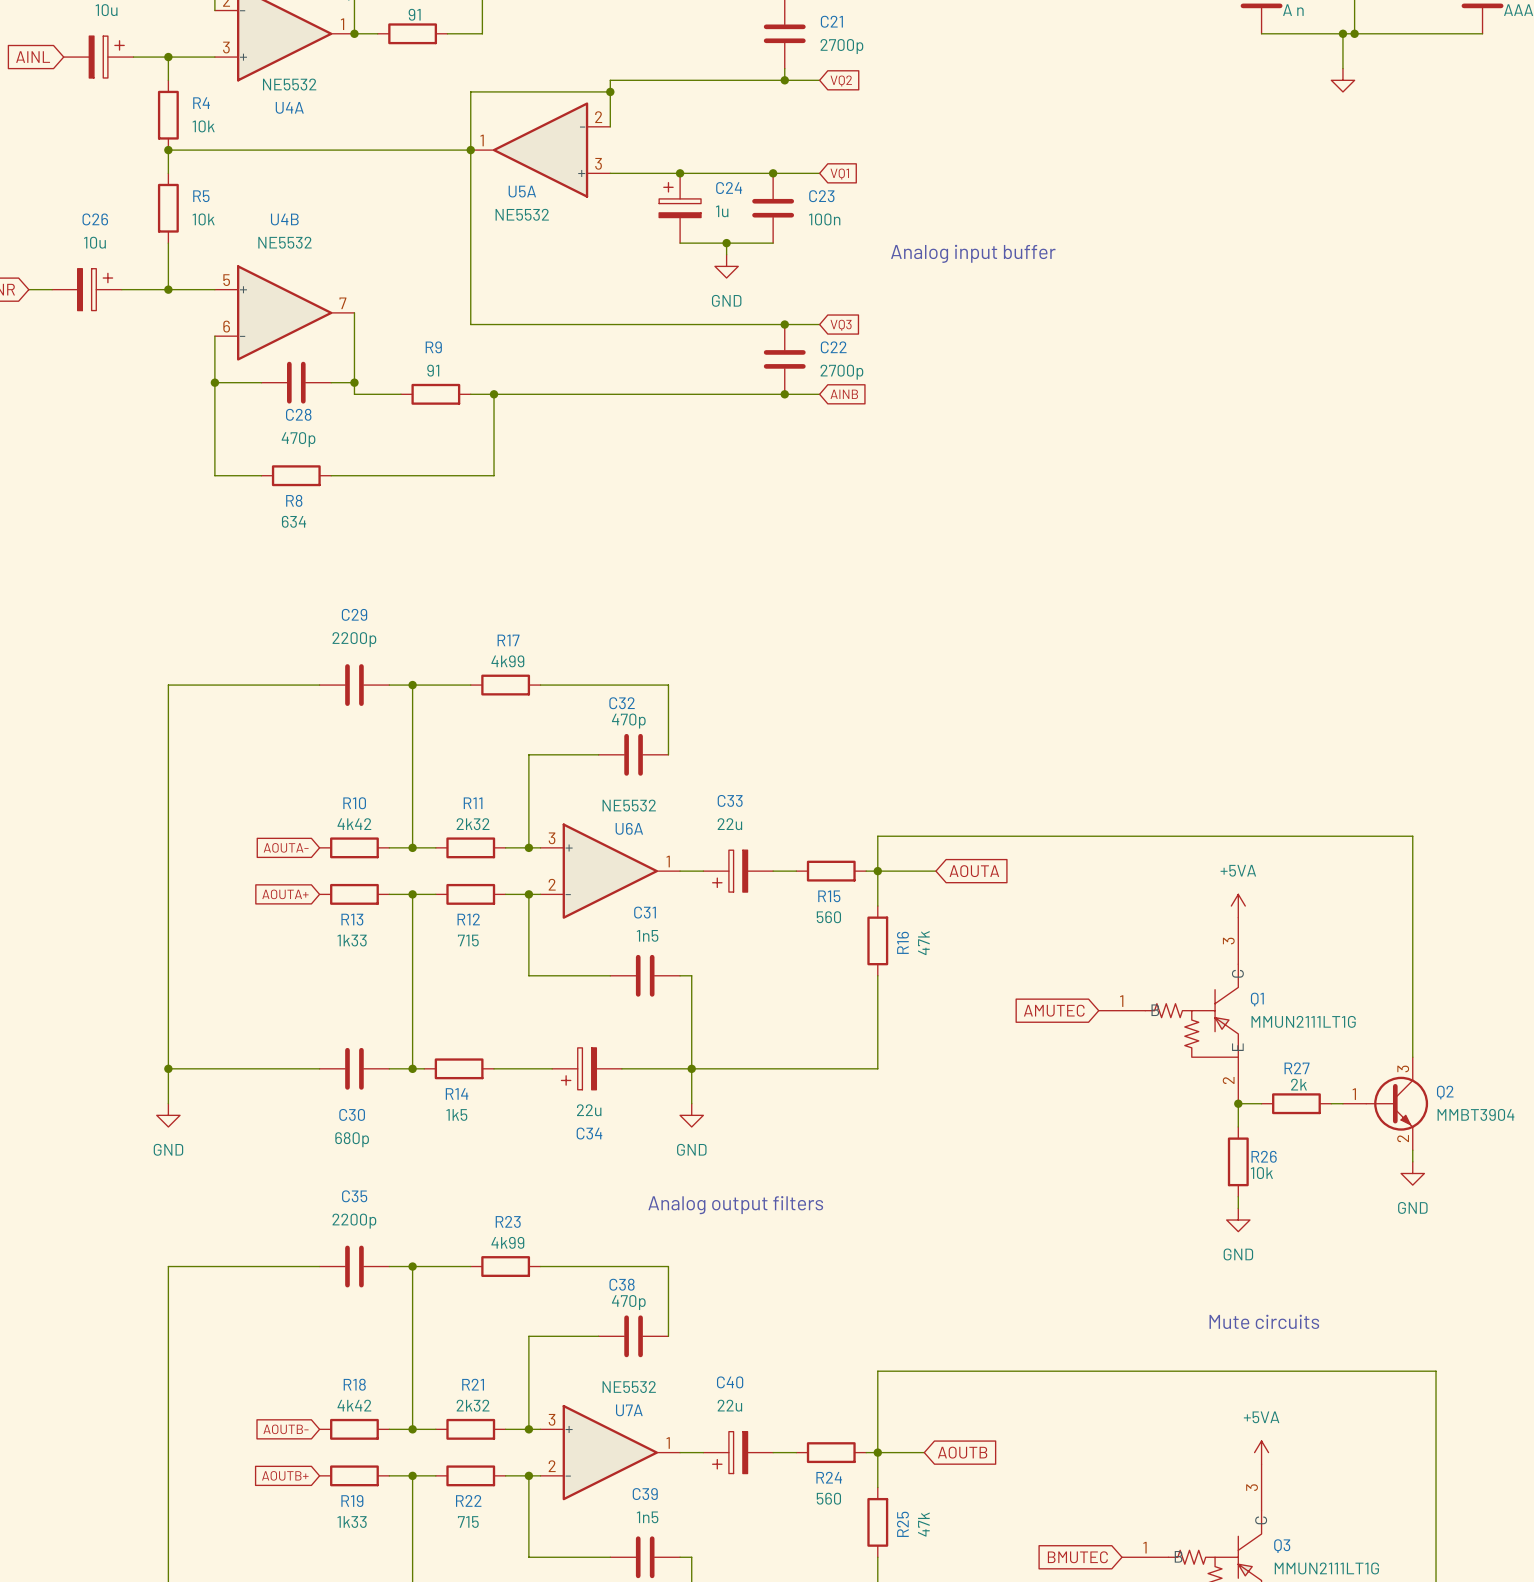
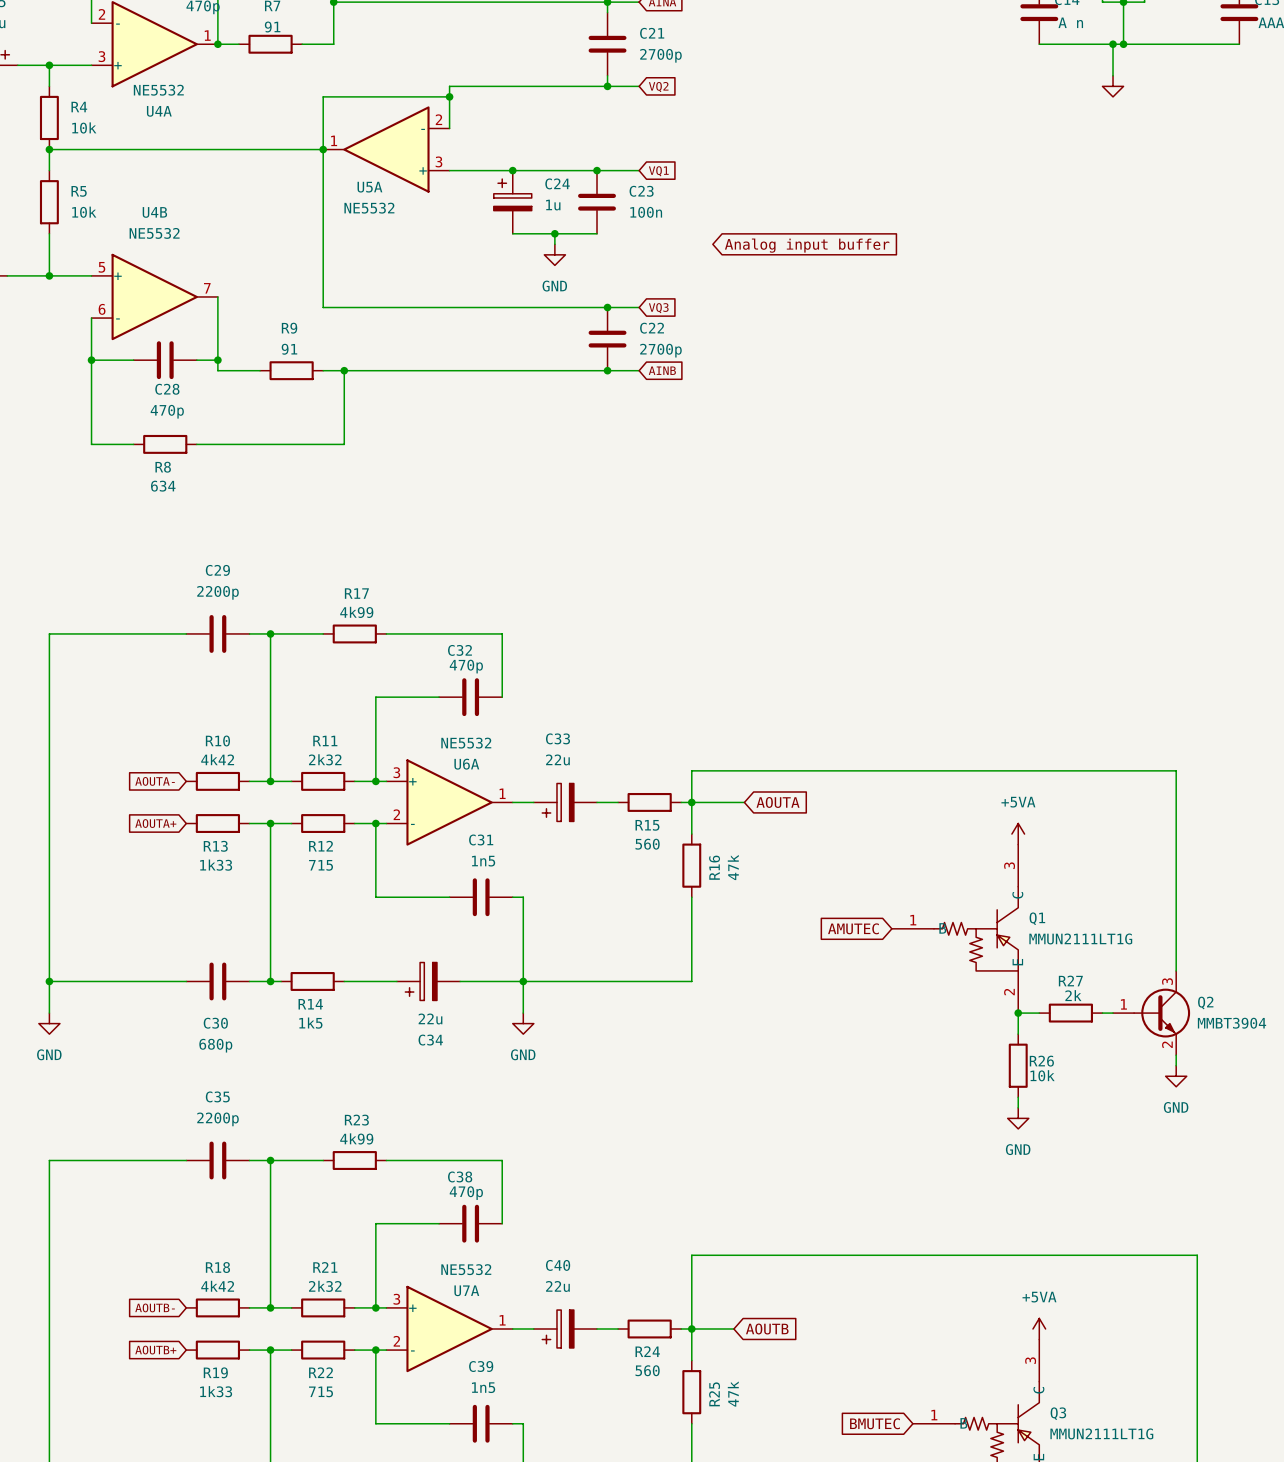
text: Analog input buffer (973, 253) -> none
global label: none -> Analog input buffer (807, 245)
text: Analog output filters (735, 1205) -> none
text: Mute circuits (1264, 1321) -> none

